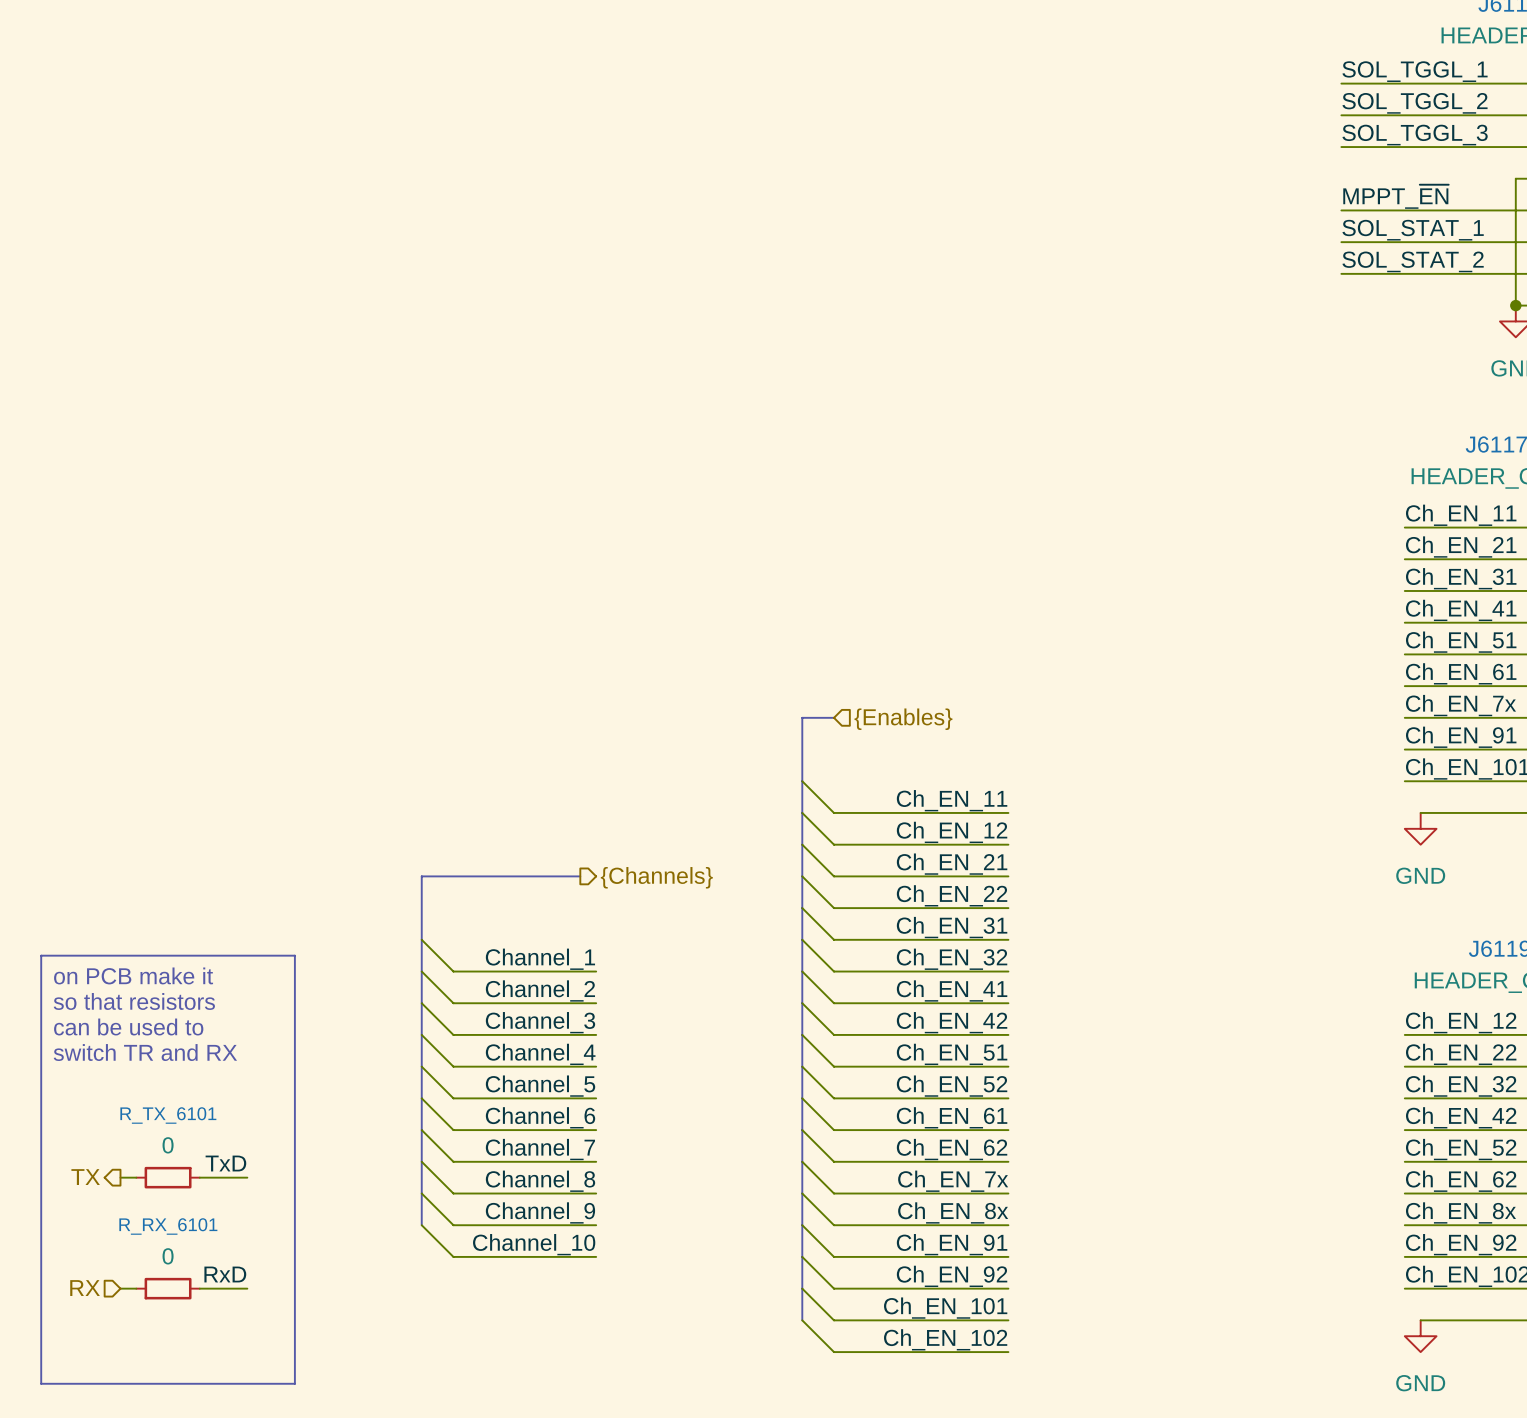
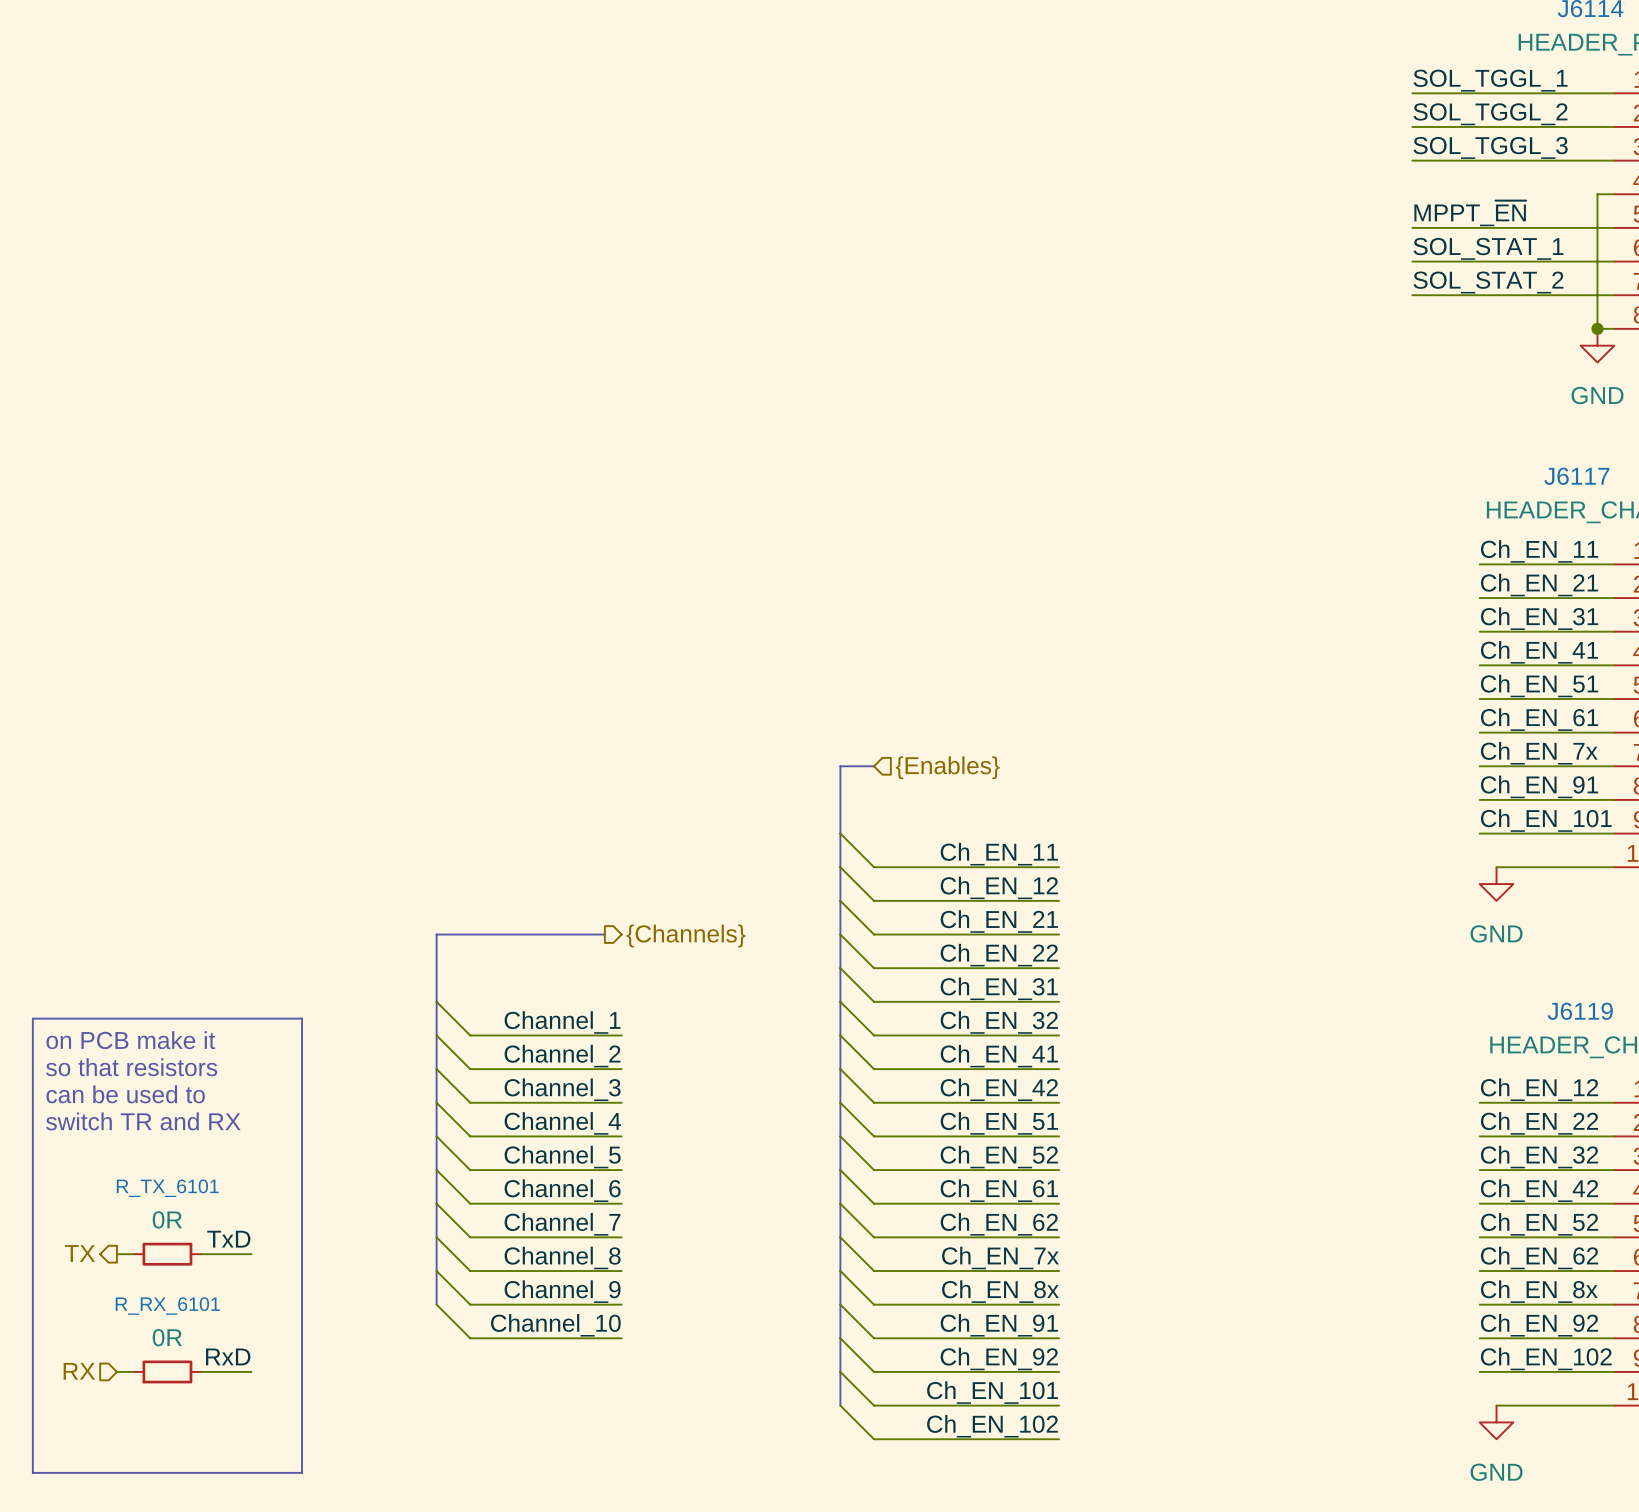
R_TX_6101 value: 0 (168, 1145) -> 0R (167, 1219)
R_RX_6101 value: 0 (168, 1256) -> 0R (167, 1337)

